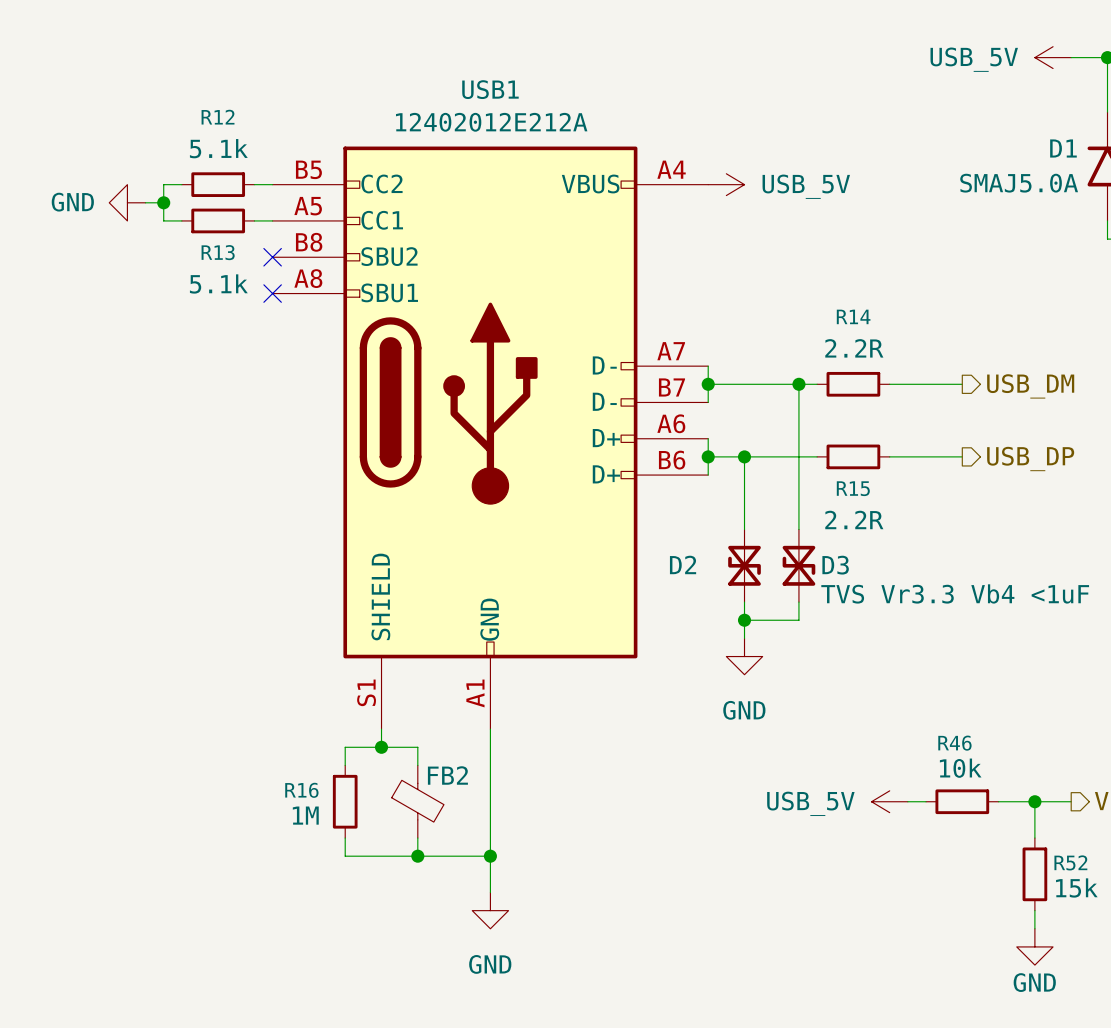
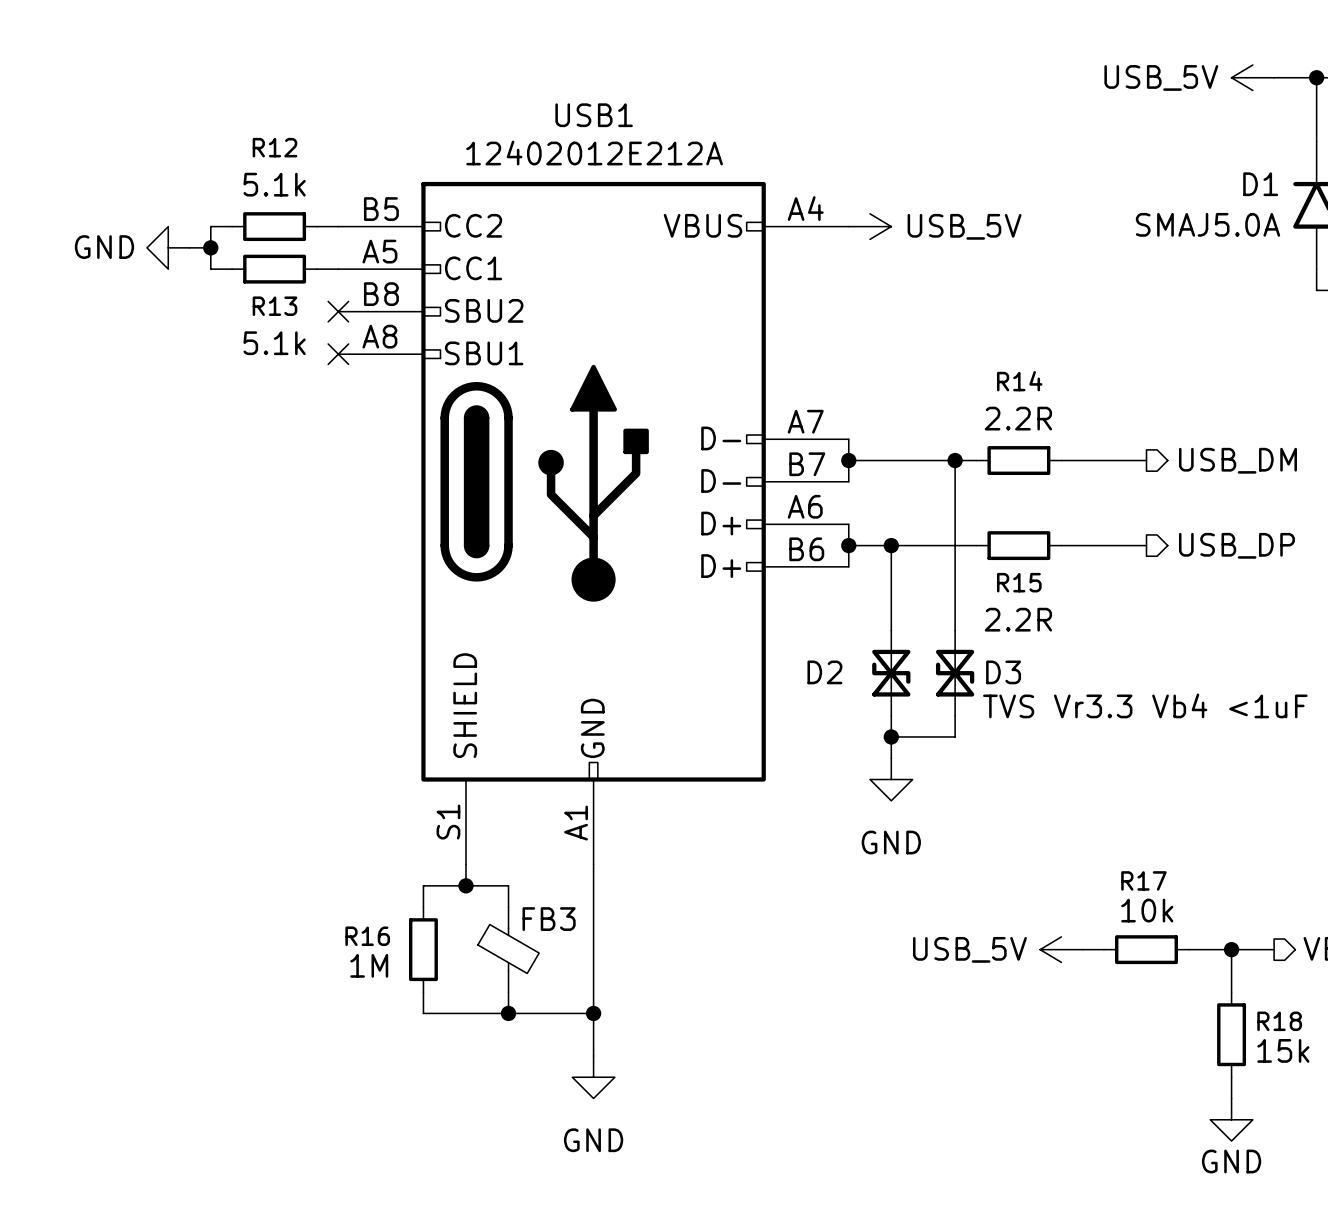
R46 name: R46 (954, 743) -> R17 (1143, 880)
FB2 name: FB2 (447, 775) -> FB3 (549, 919)
R52 name: R52 (1070, 862) -> R18 (1279, 1021)

